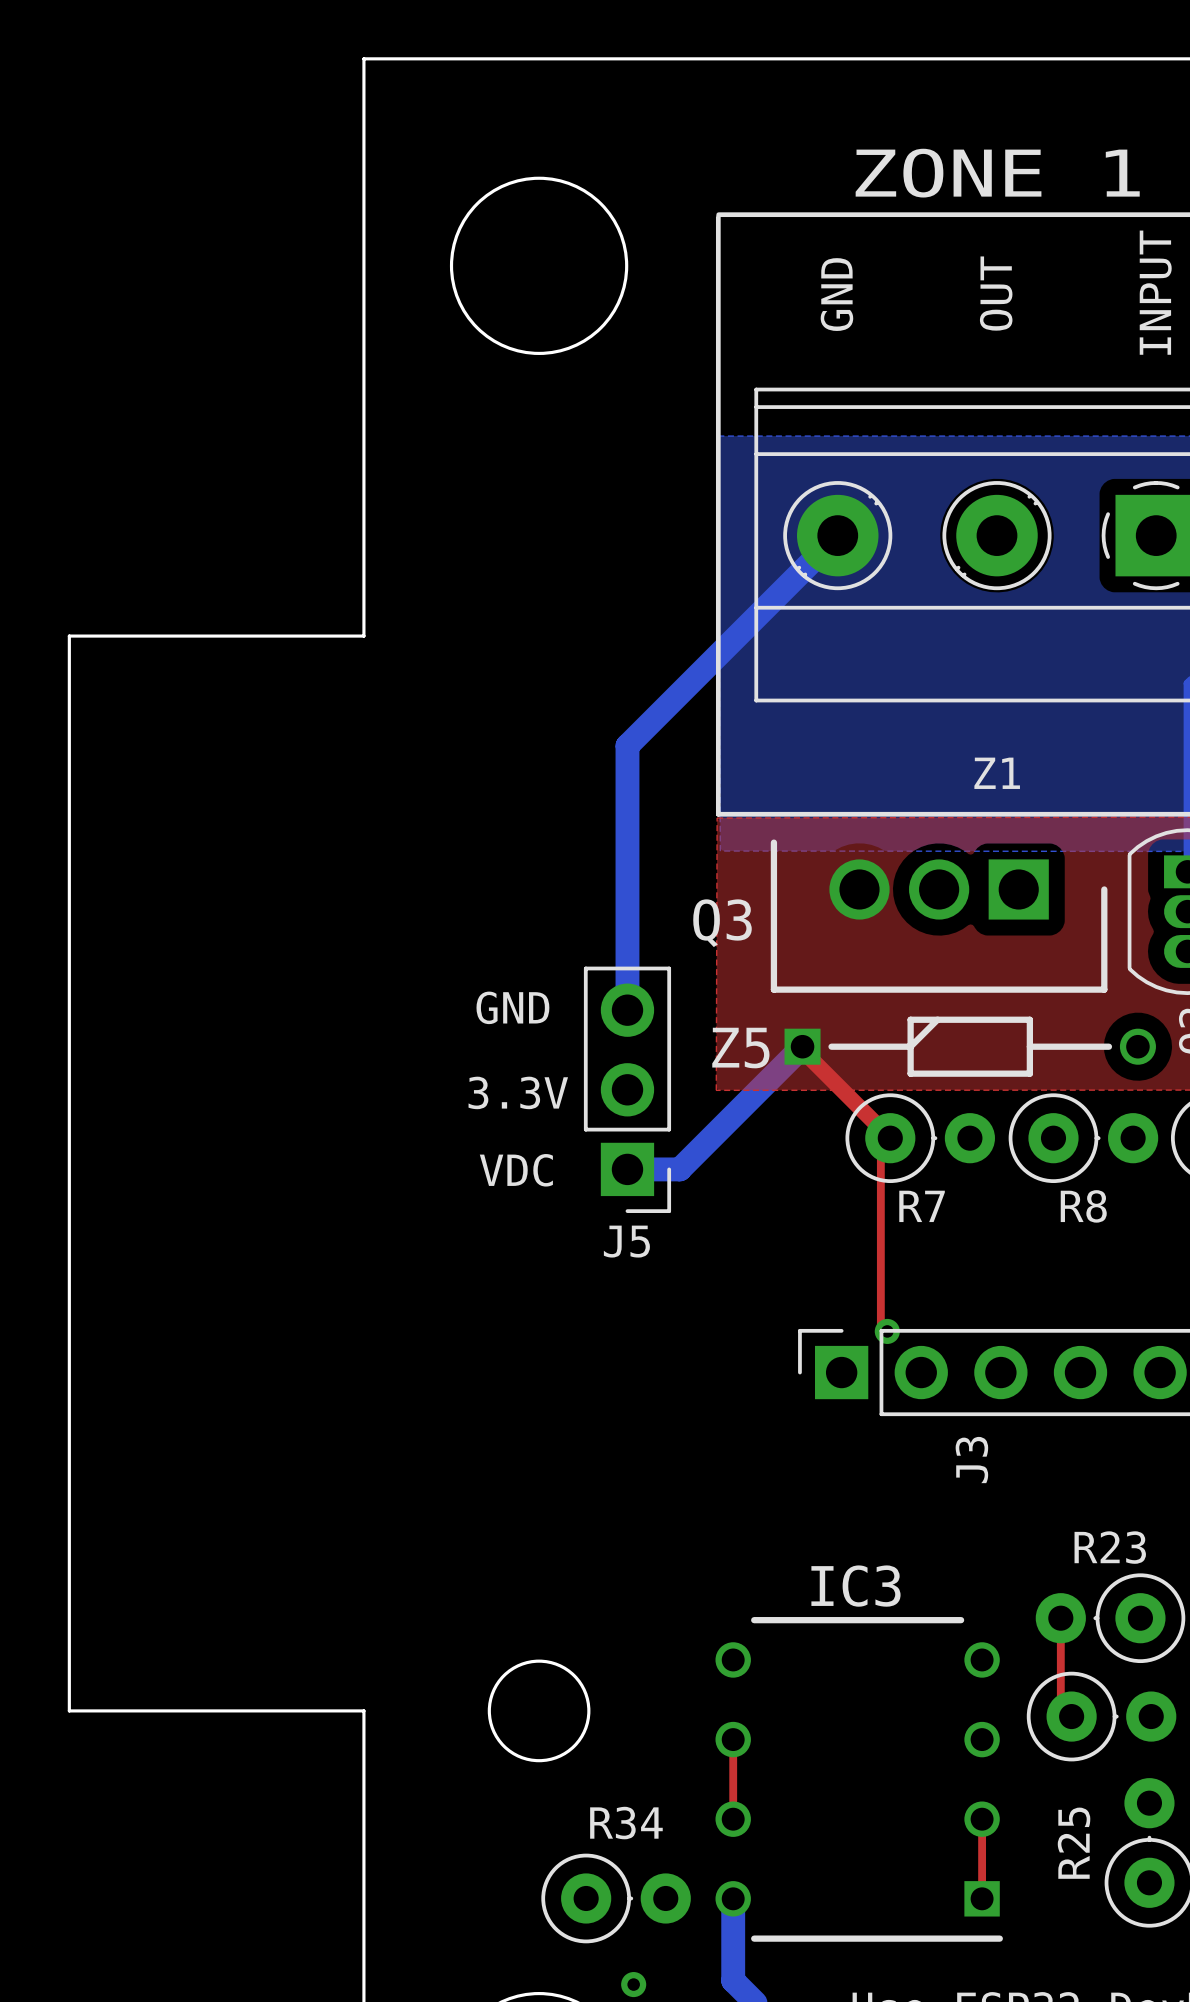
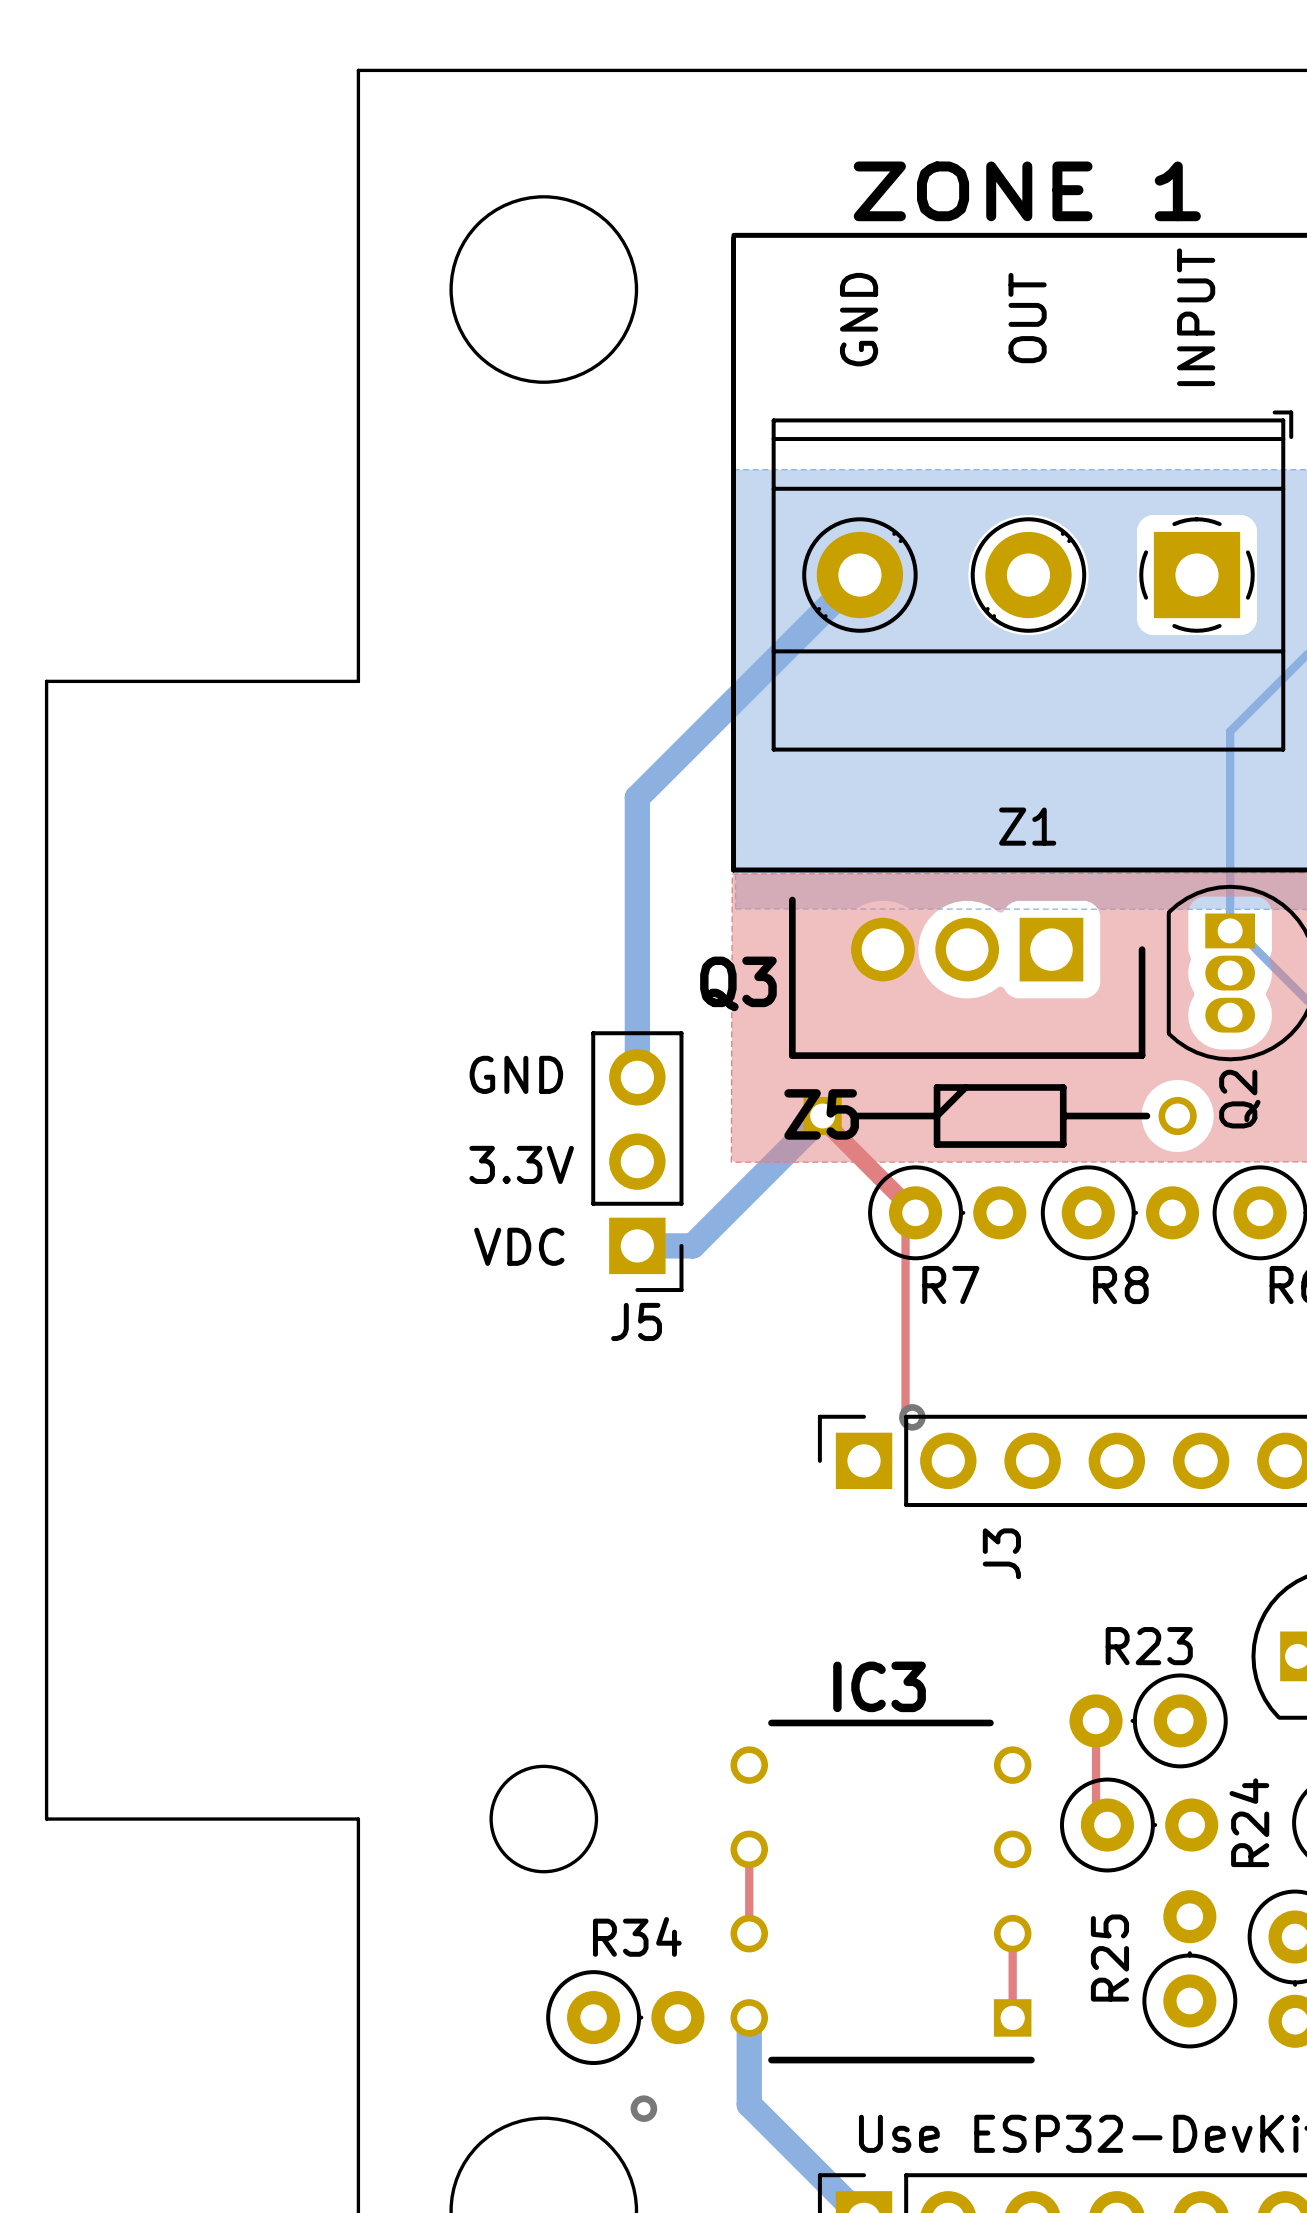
Z5 name position: Z5 (740, 1048) -> Z5 (821, 1114)

